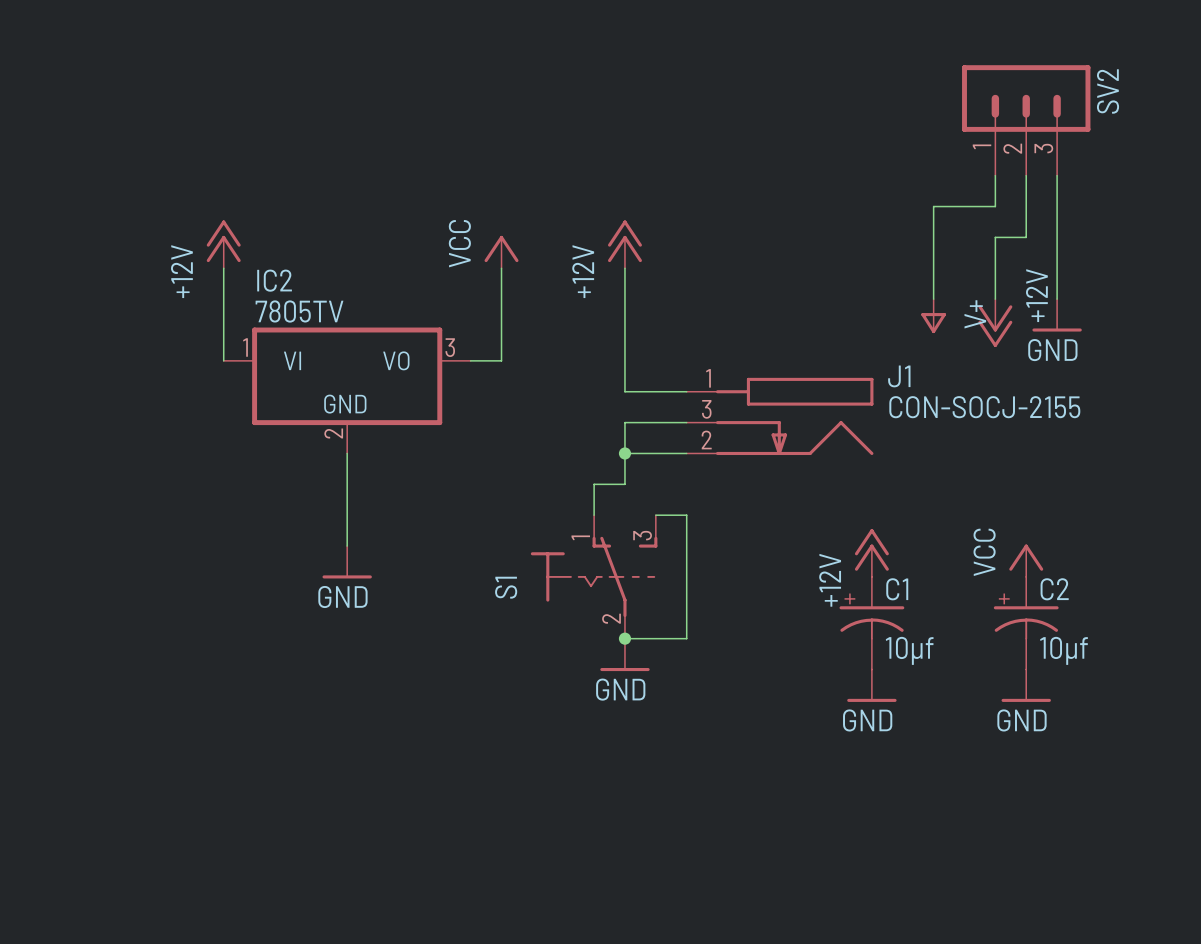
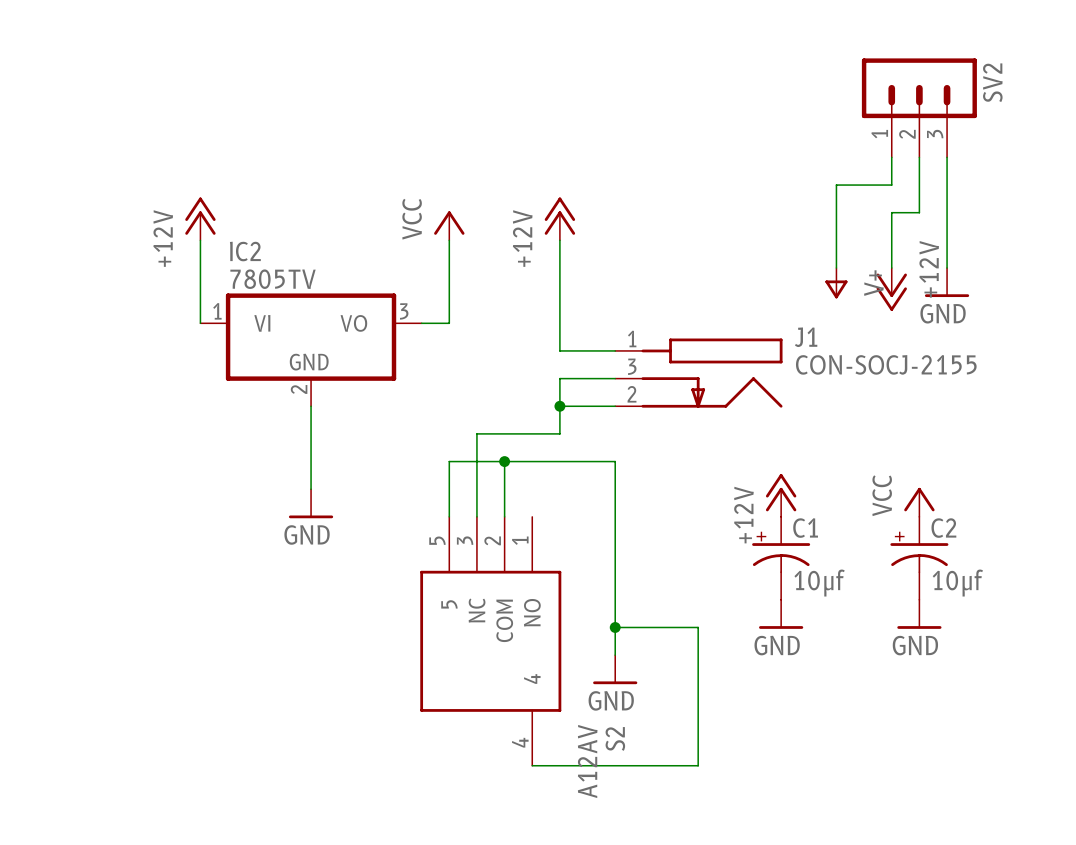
wire: (594, 484) (594, 515) -> (532, 433) (476, 433) (476, 516)
wire: none -> (504, 461) (504, 516)
junction: none -> (504, 461)
wire: none -> (587, 461) (449, 461) (449, 516)
S1: (594, 576) -> none
wire: (624, 638) (686, 638) -> (615, 655) (615, 572)
junction: (624, 638) -> none
power symbol position: GND (624, 654) -> GND (615, 669)
wire: none -> (615, 627) (698, 627) (698, 765) (532, 765)
junction: none -> (615, 627)
S2: none -> A12AV (490, 641)

